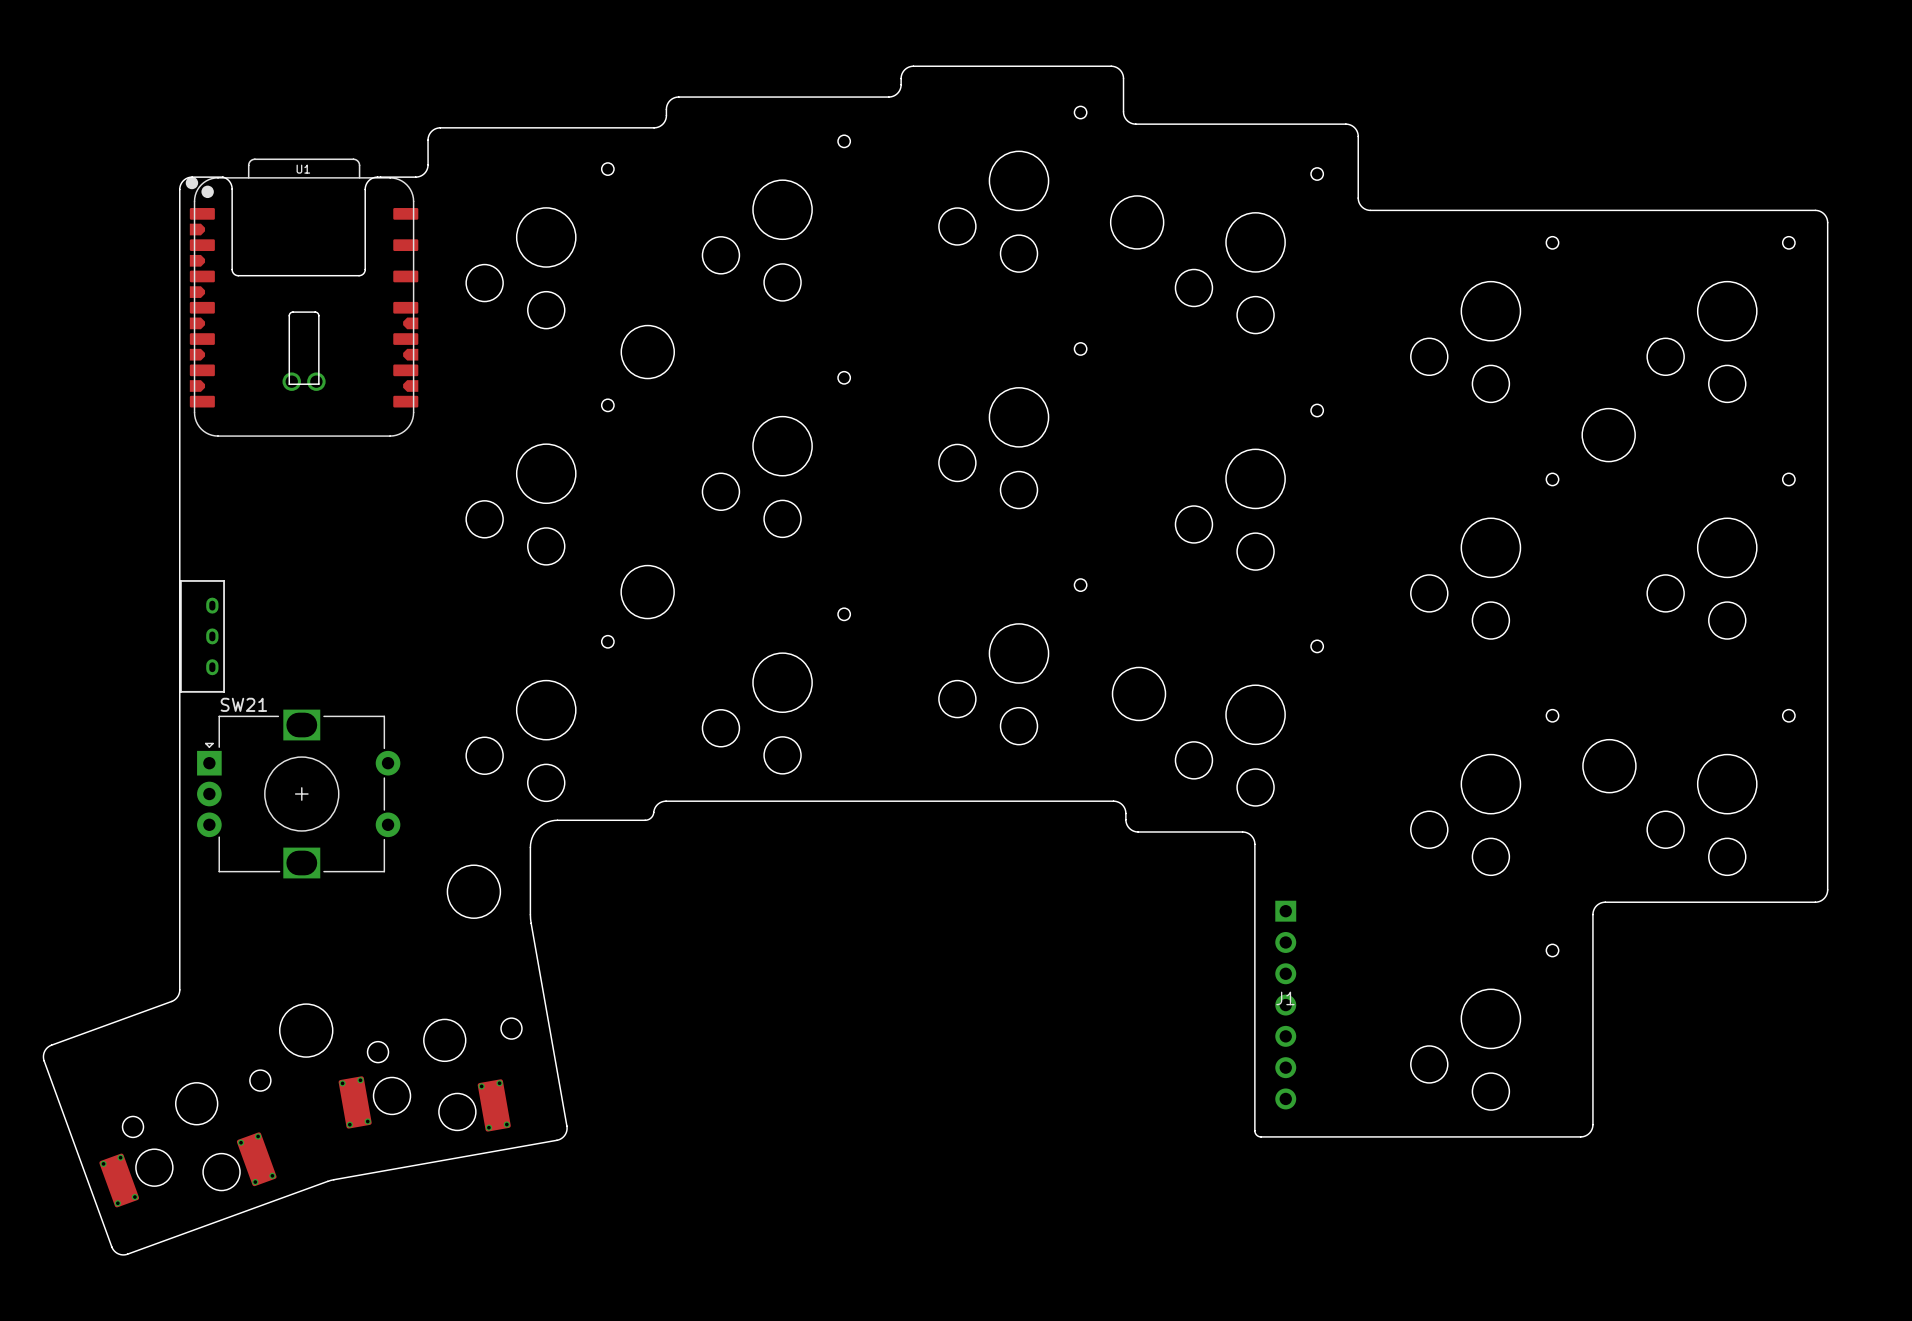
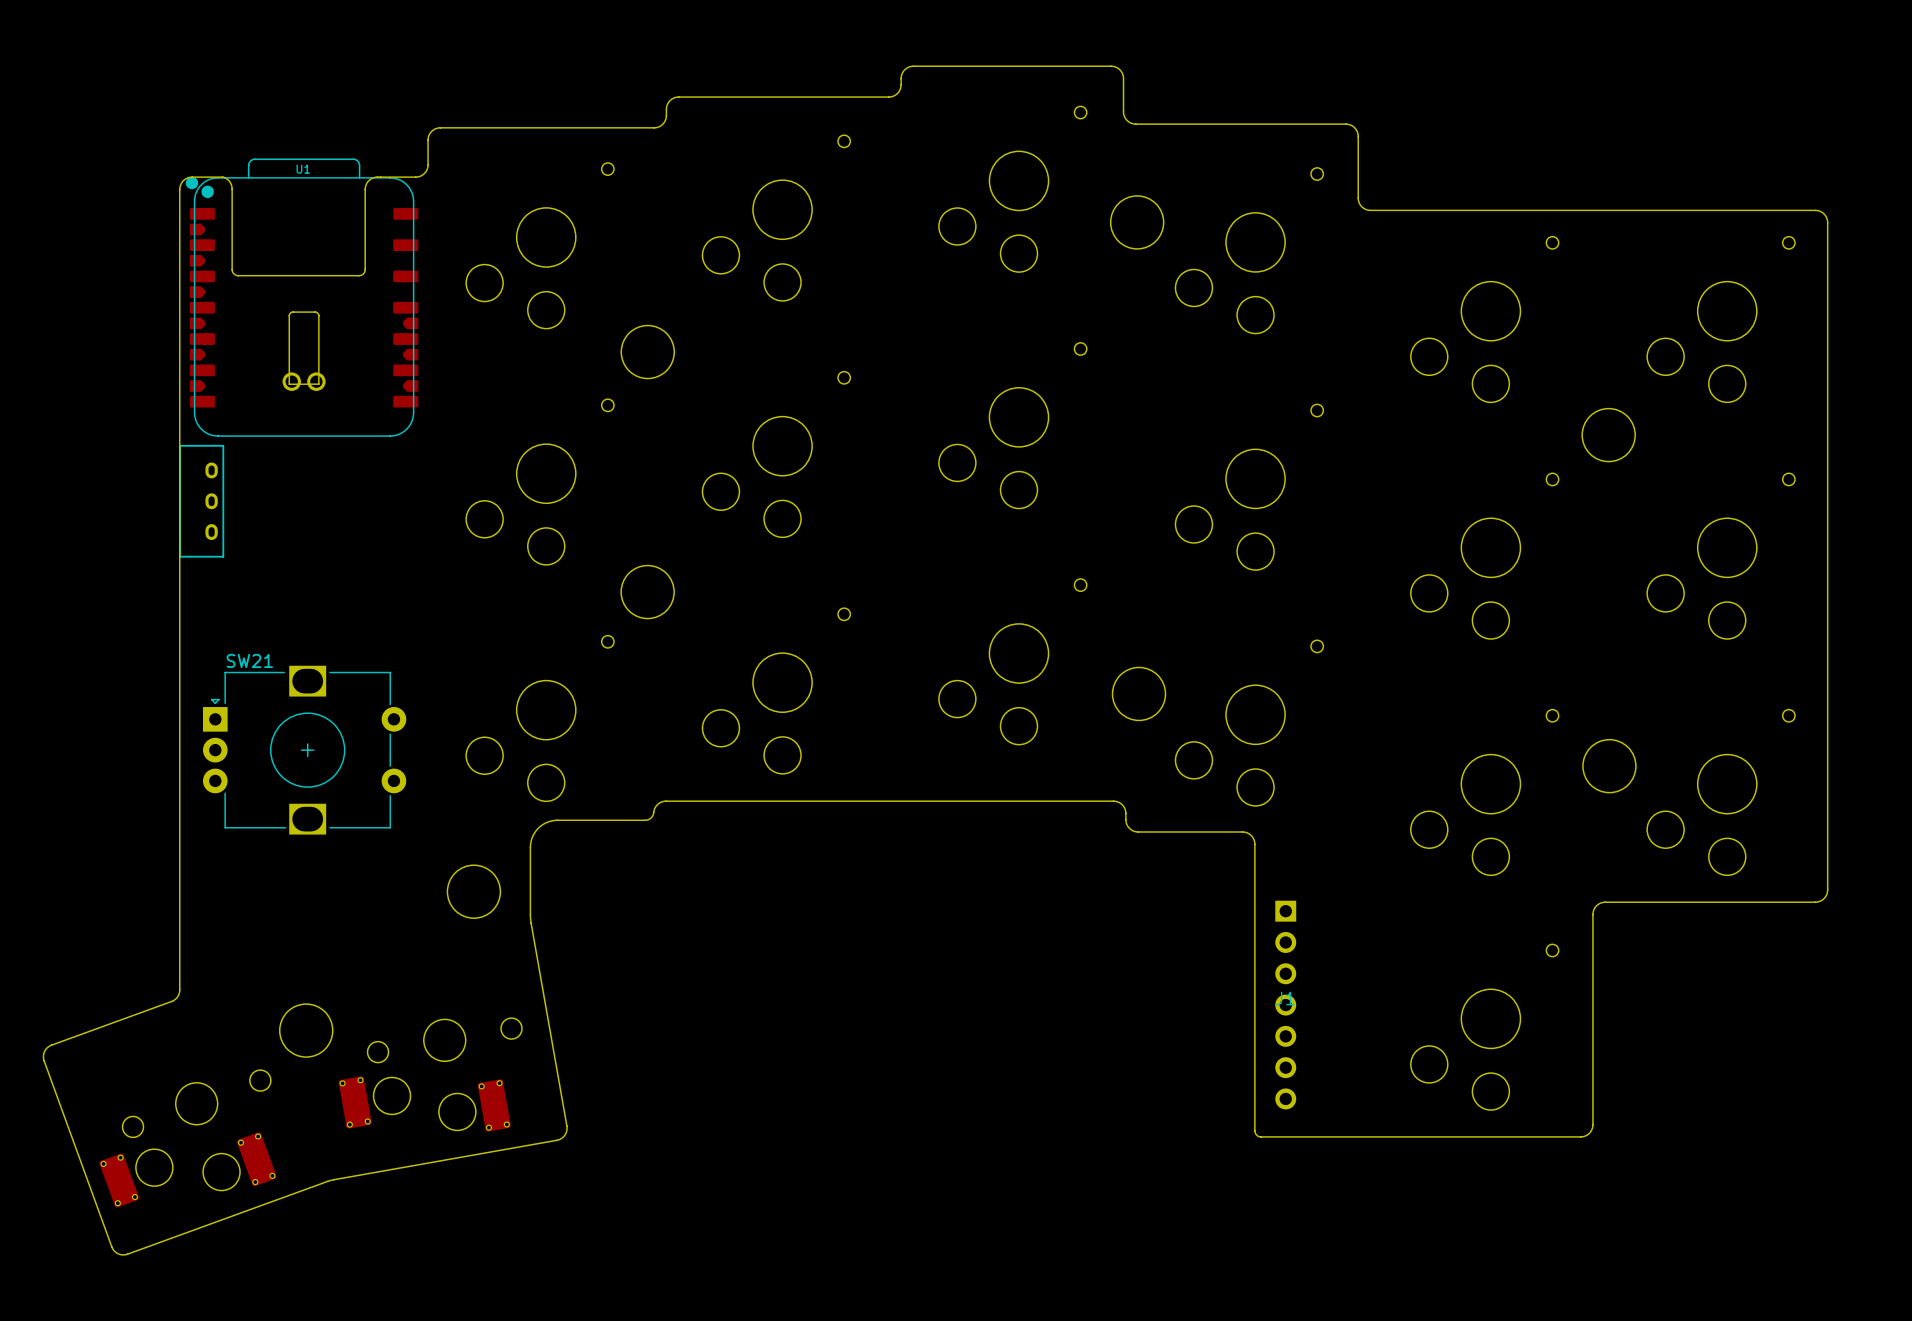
part position: (202, 636) -> (201, 501)
SW21 position: (298, 794) -> (304, 750)

